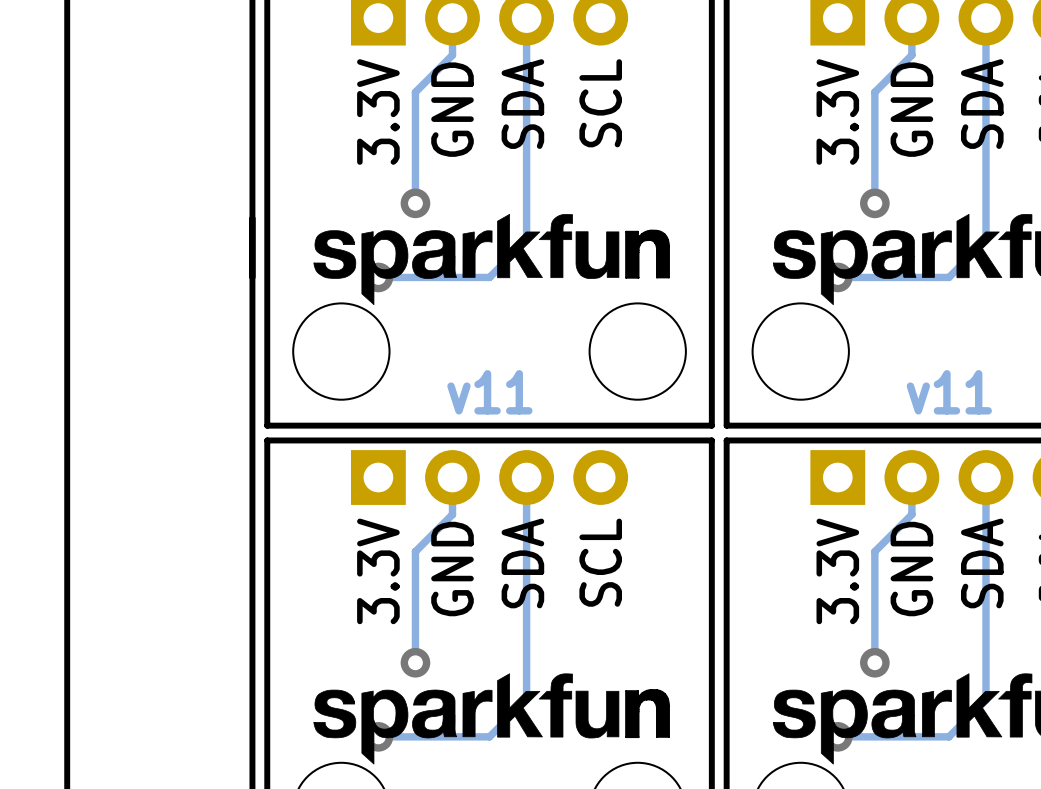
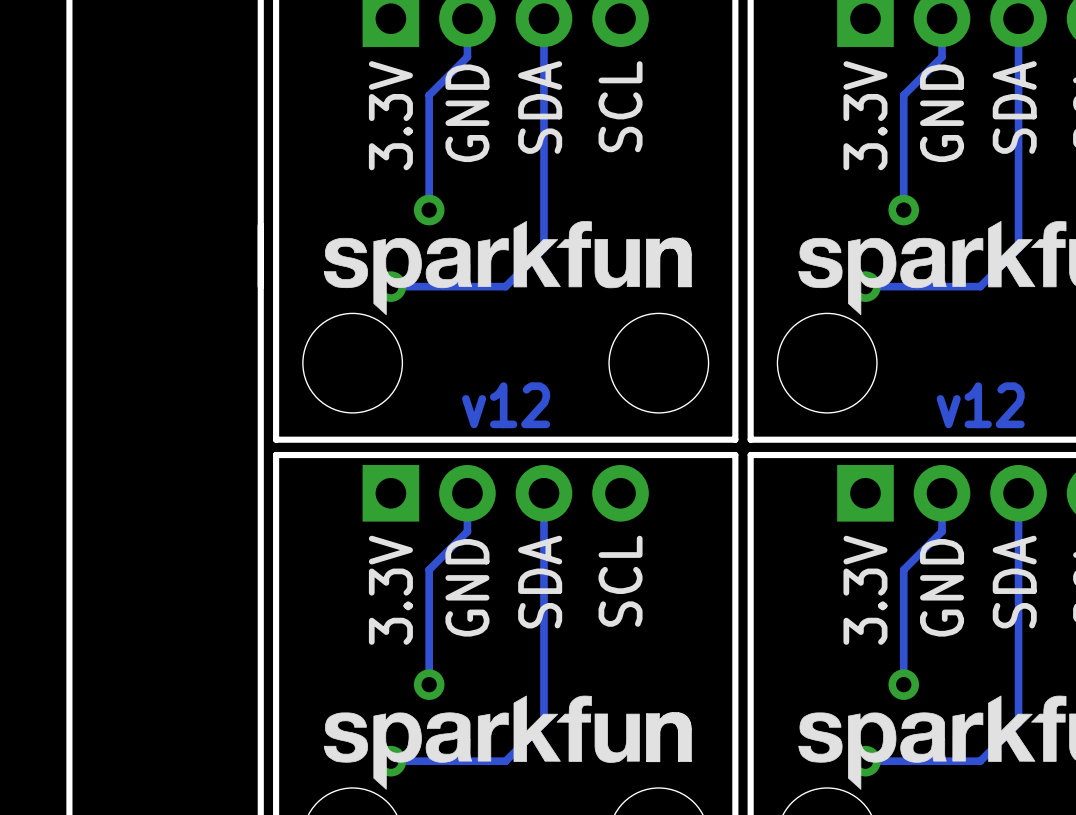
text: v11 (489, 392) -> v12 (506, 405)
text: v11 (949, 392) -> v12 (980, 405)

